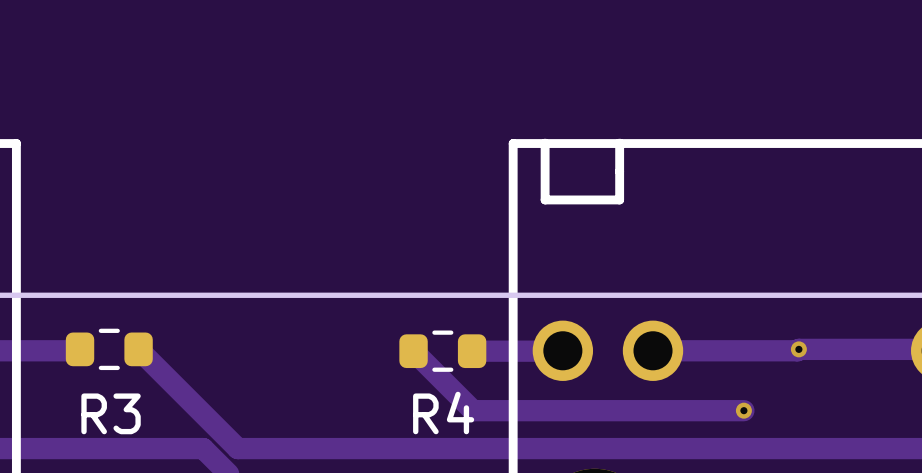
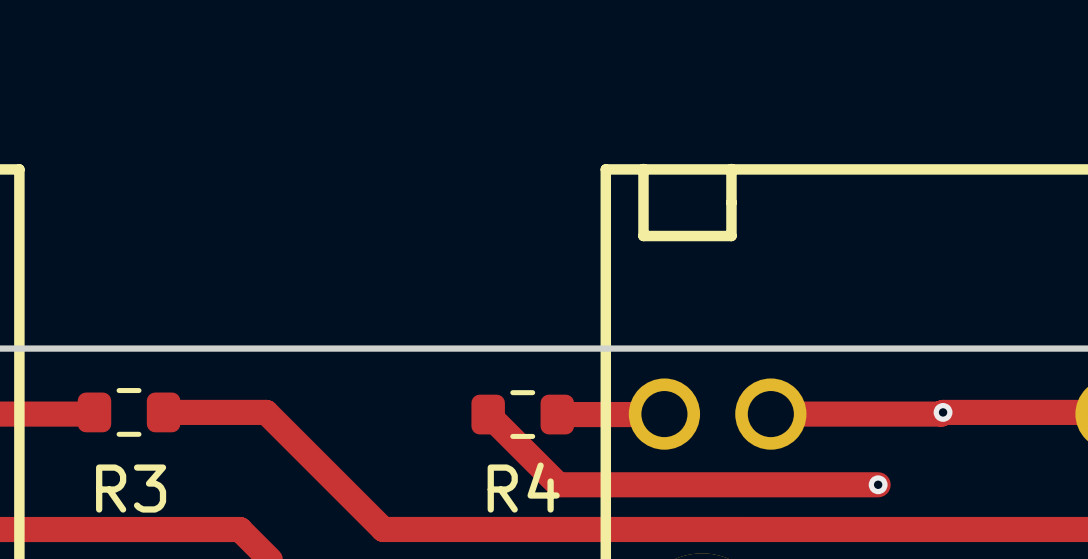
track: (138, 349) (237, 448) (324, 448) -> (163, 412) (266, 412) (383, 529)

